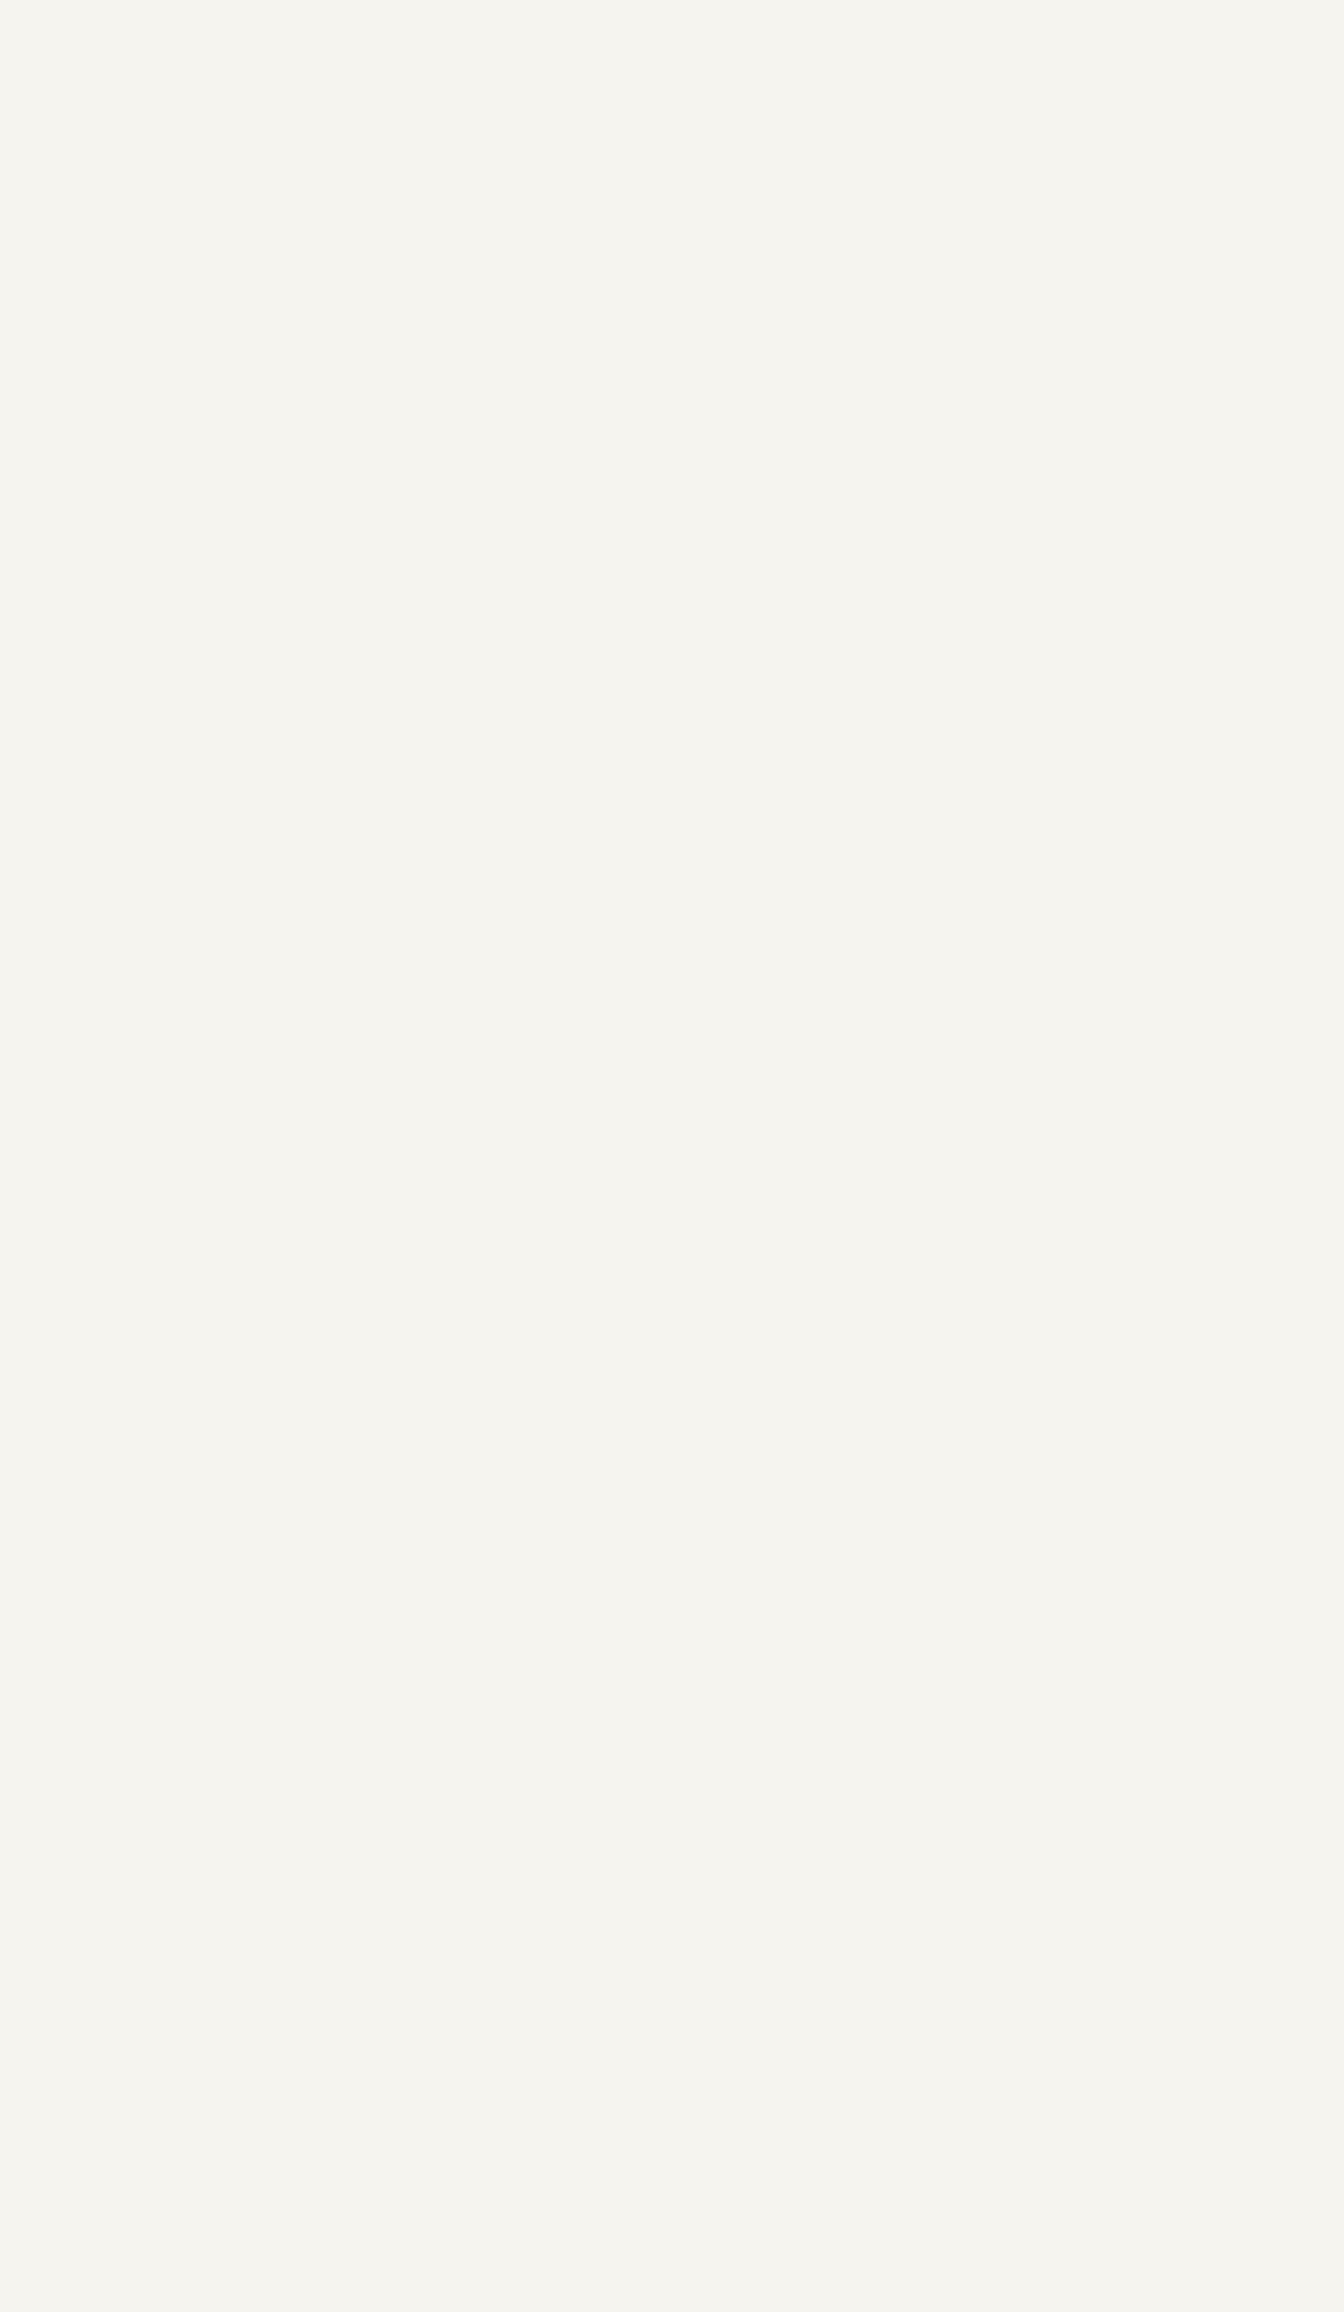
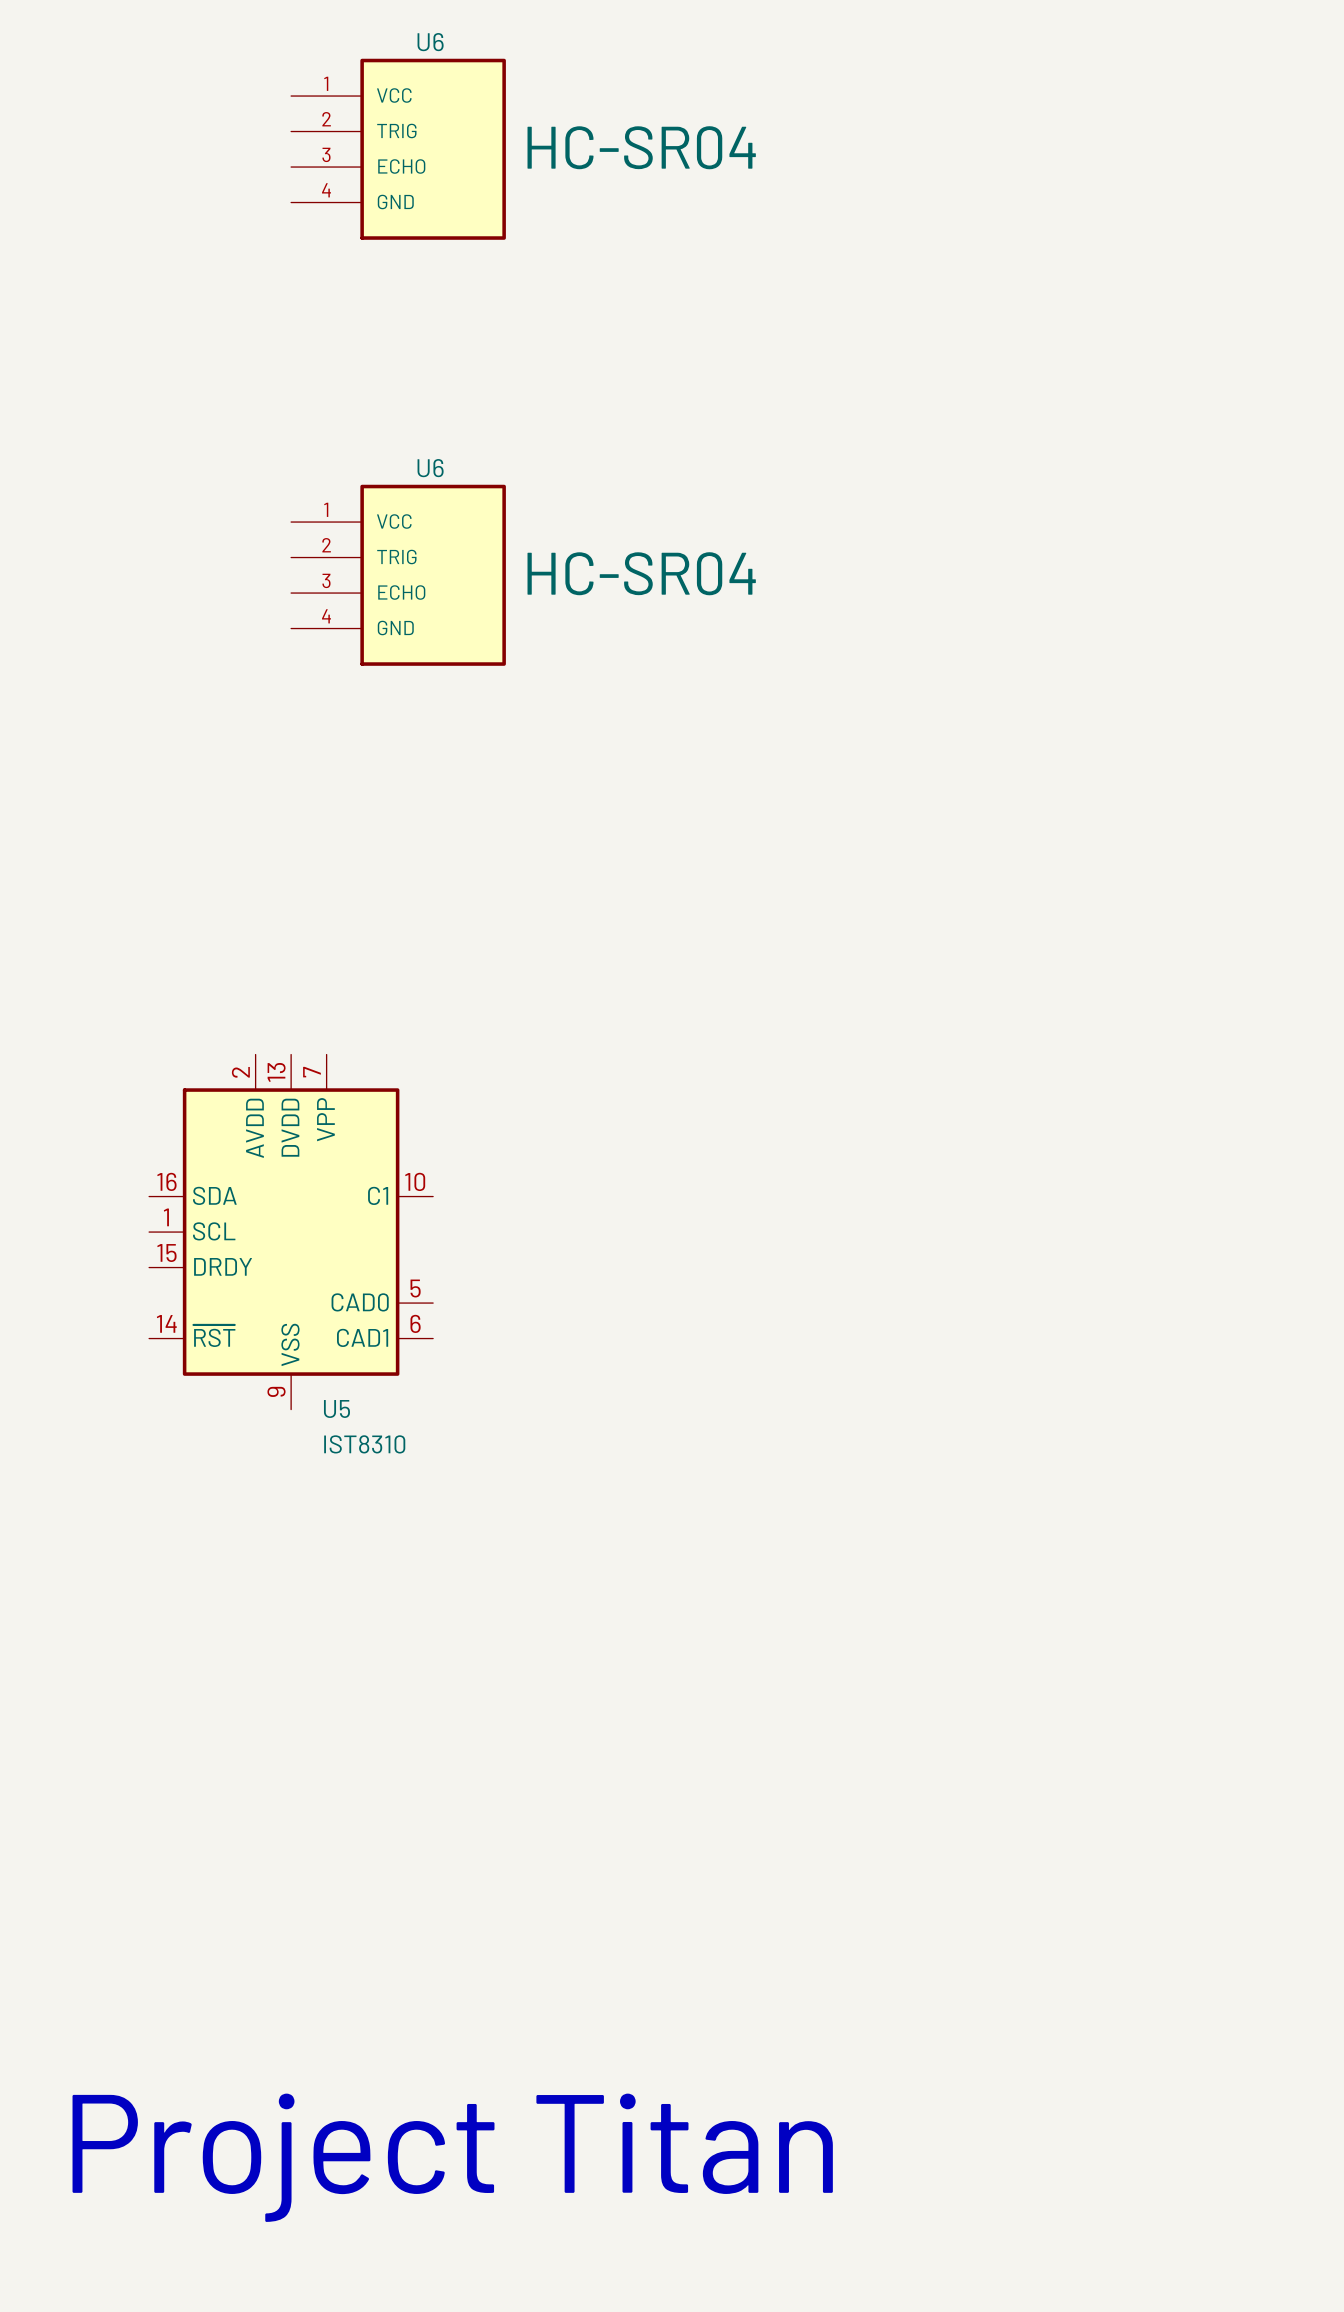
U6: none -> HC-SR04 (398, 149)
U6: none -> HC-SR04 (398, 575)
U5: none -> IST8310 (291, 1232)
text: none -> Project Titan (452, 2157)

